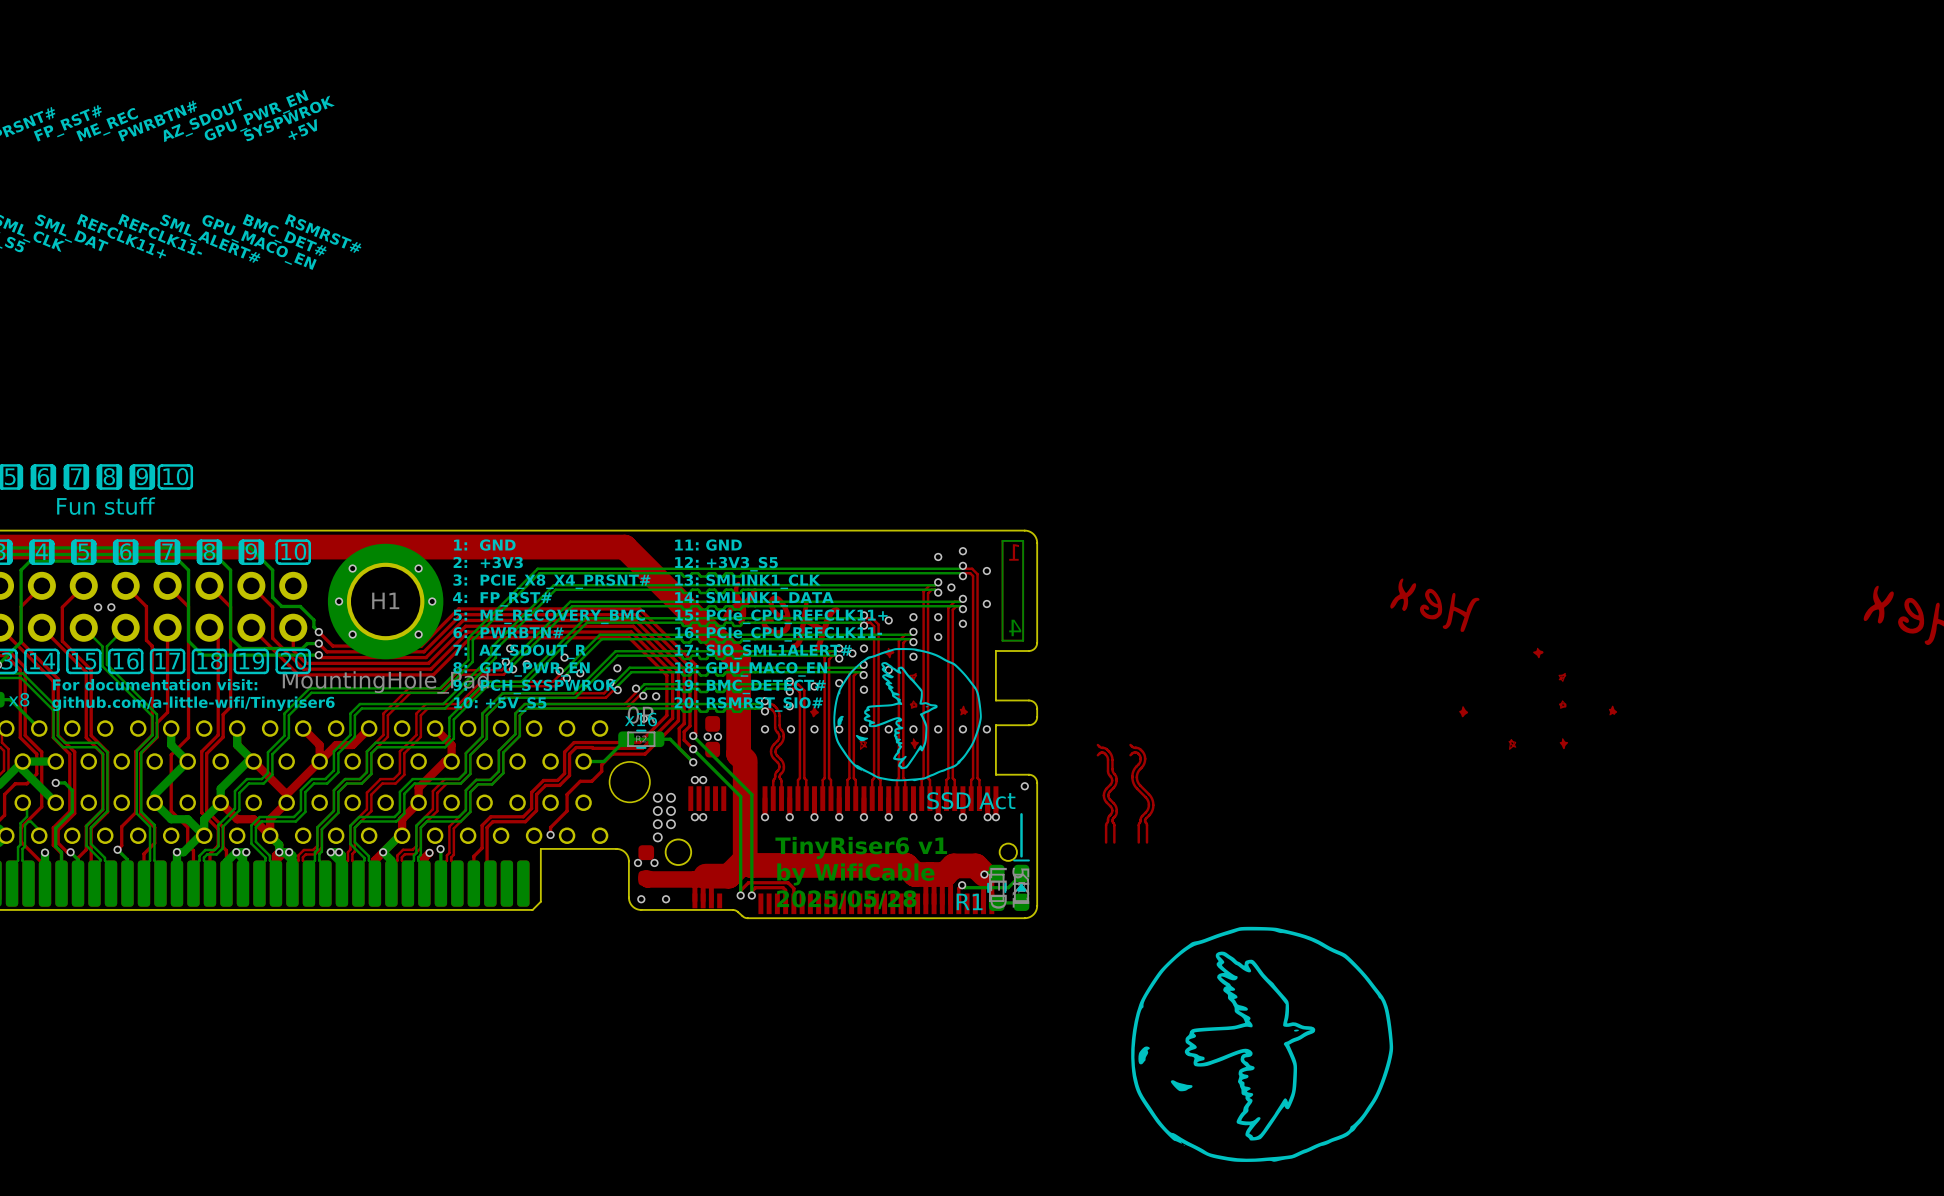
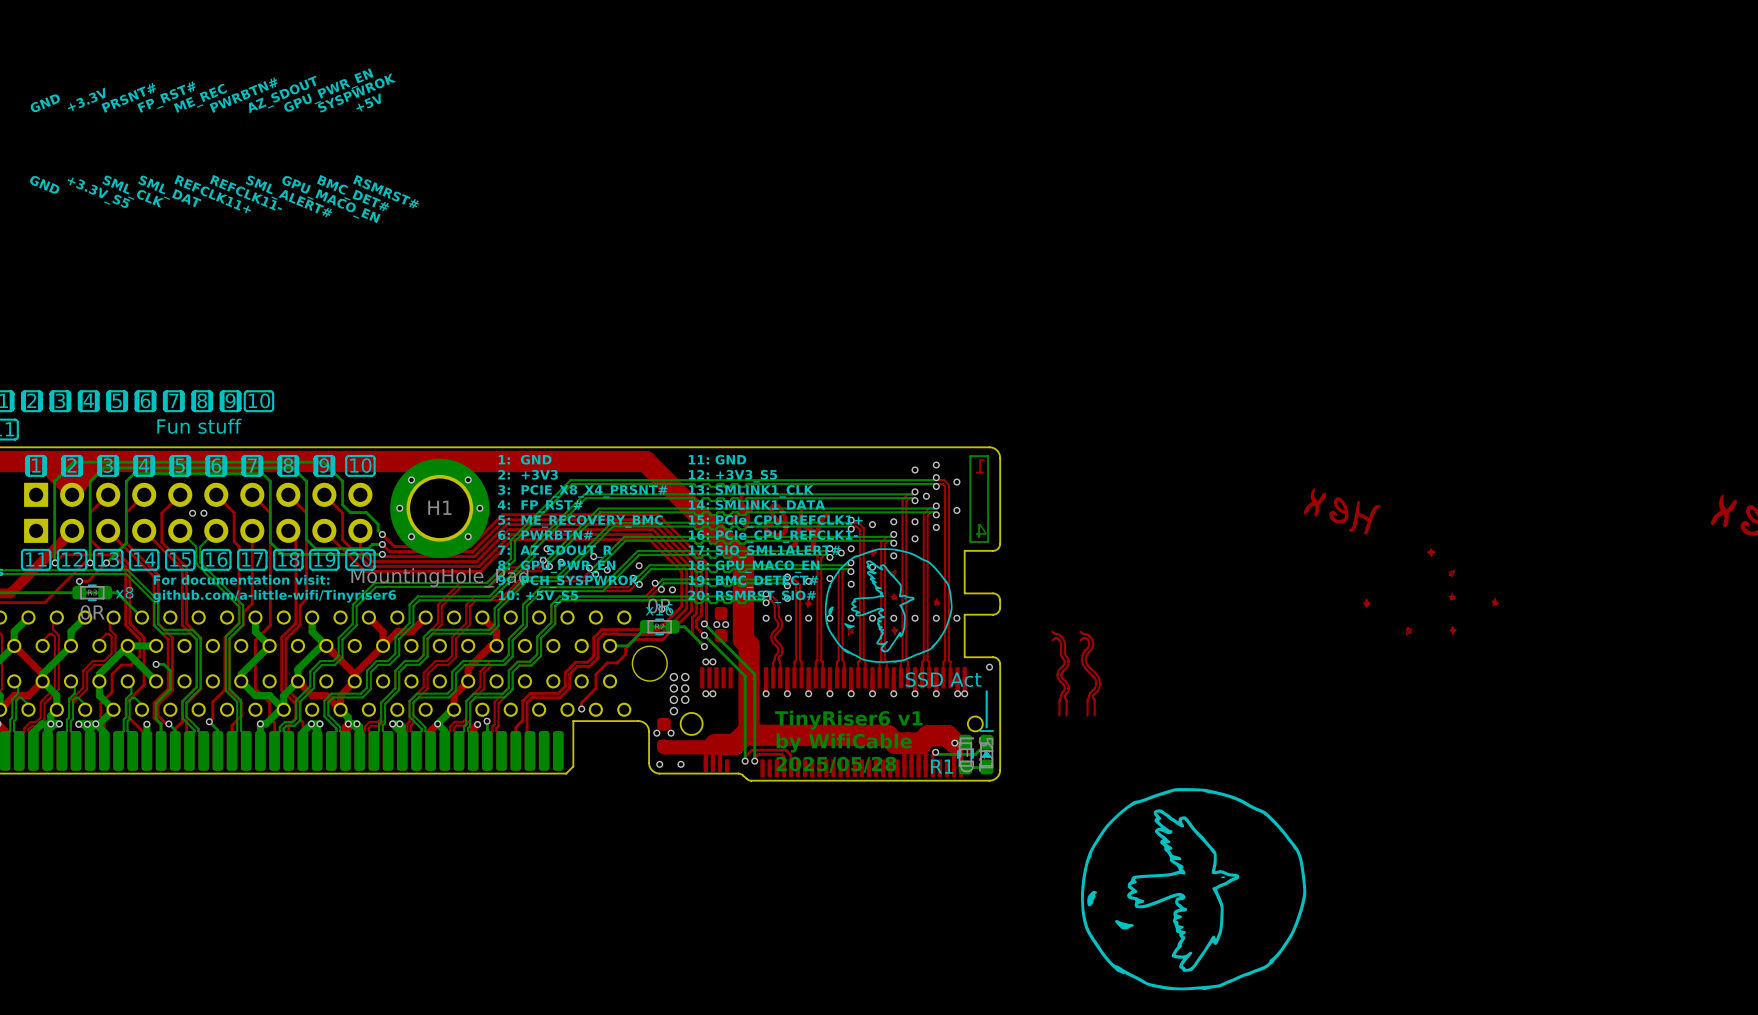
text: 15: PCIe_CPU_REFCLK11+ (781, 616) -> 15: PCIe_CPU_REFCLK1+ (775, 521)
text: 16: PCIe_CPU_REFCLK11- (778, 634) -> 16: PCIe_CPU_REFCLK1- (773, 536)

